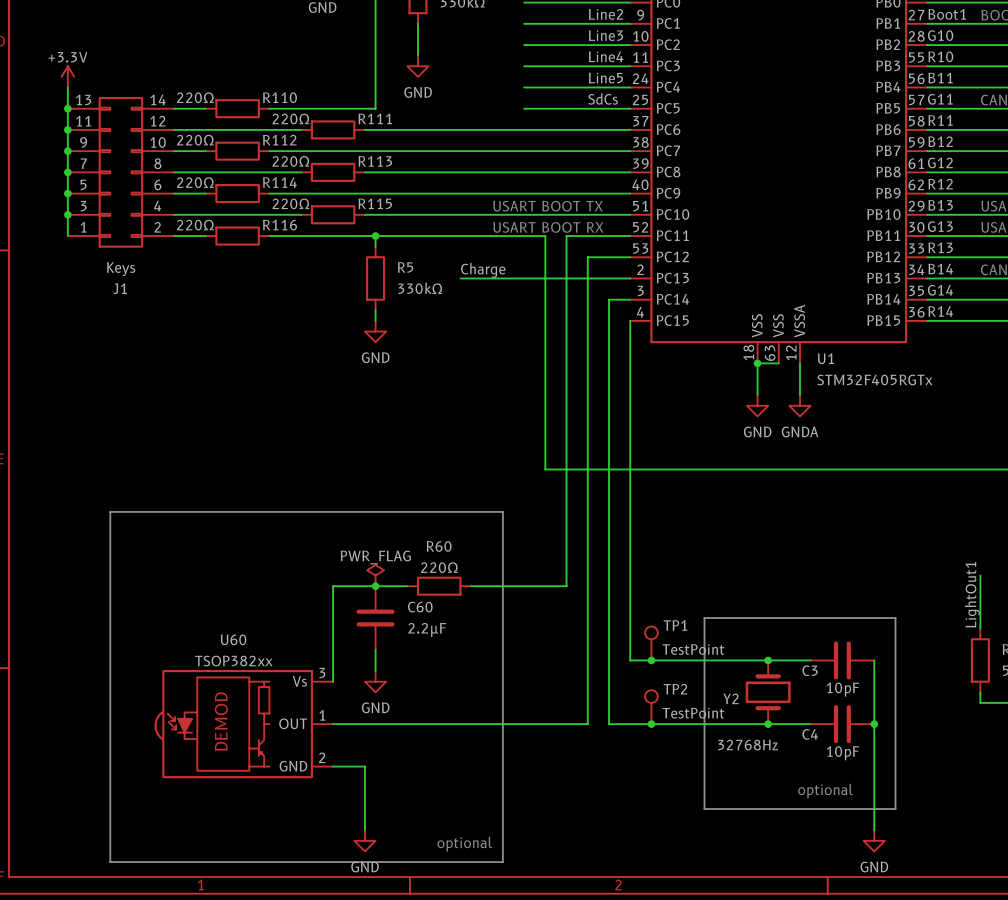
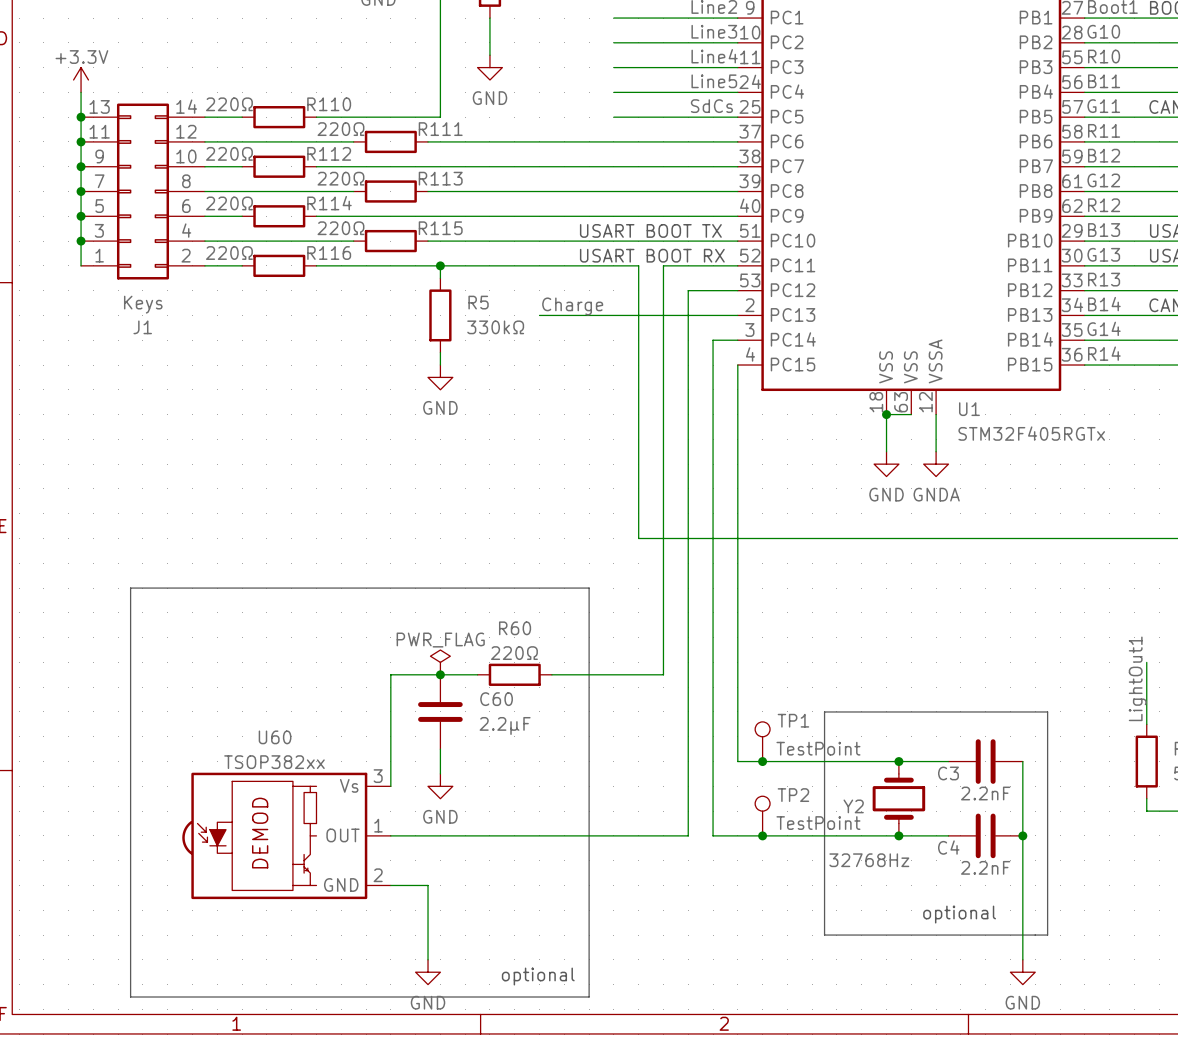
C3 value: 10pF (842, 689) -> 2.2nF (985, 793)
C4 value: 10pF (842, 753) -> 2.2nF (985, 867)

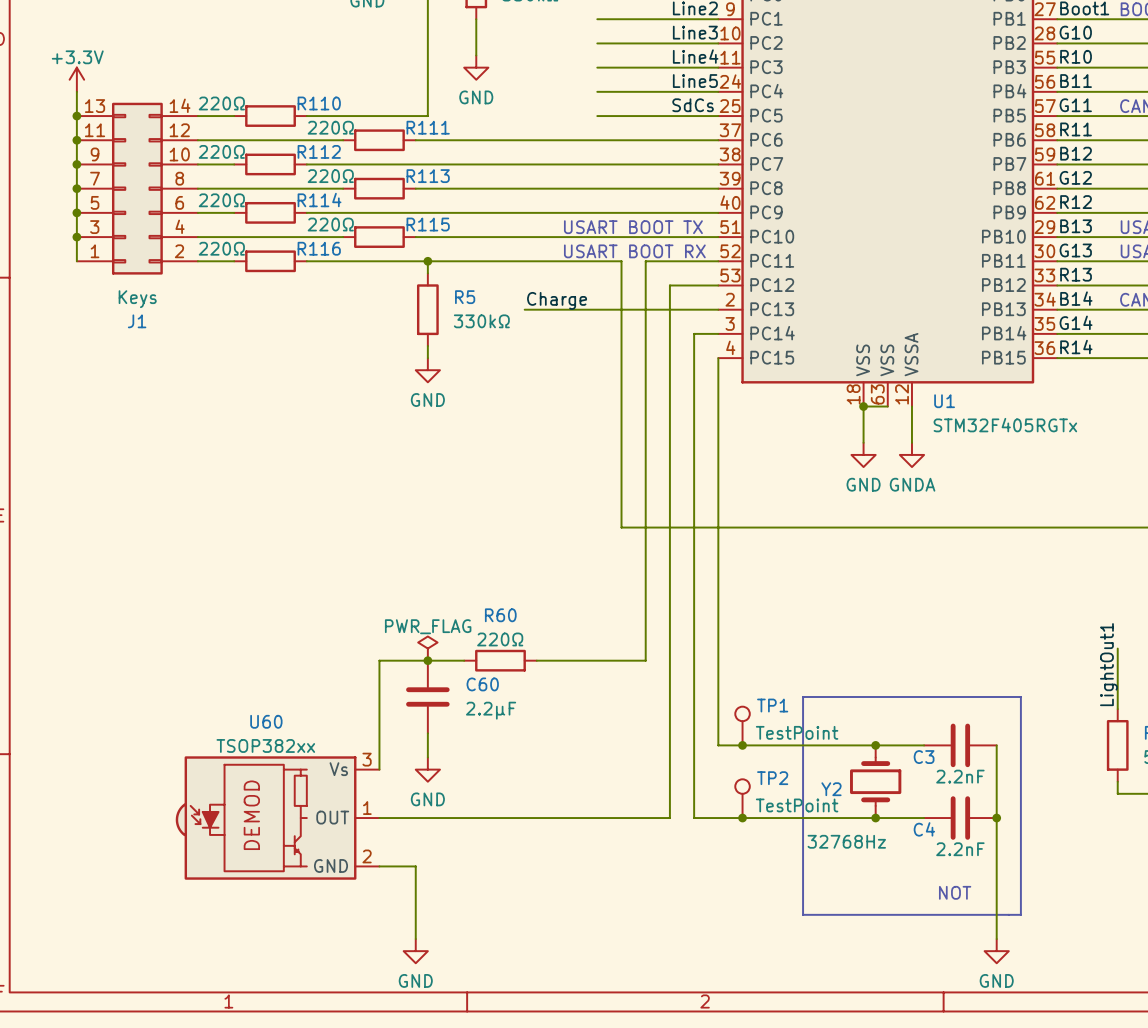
line: (130, 588) (589, 588) (589, 997) (130, 997) (130, 588) -> none
text: optional (959, 914) -> NOT (955, 892)
text: optional (538, 976) -> none

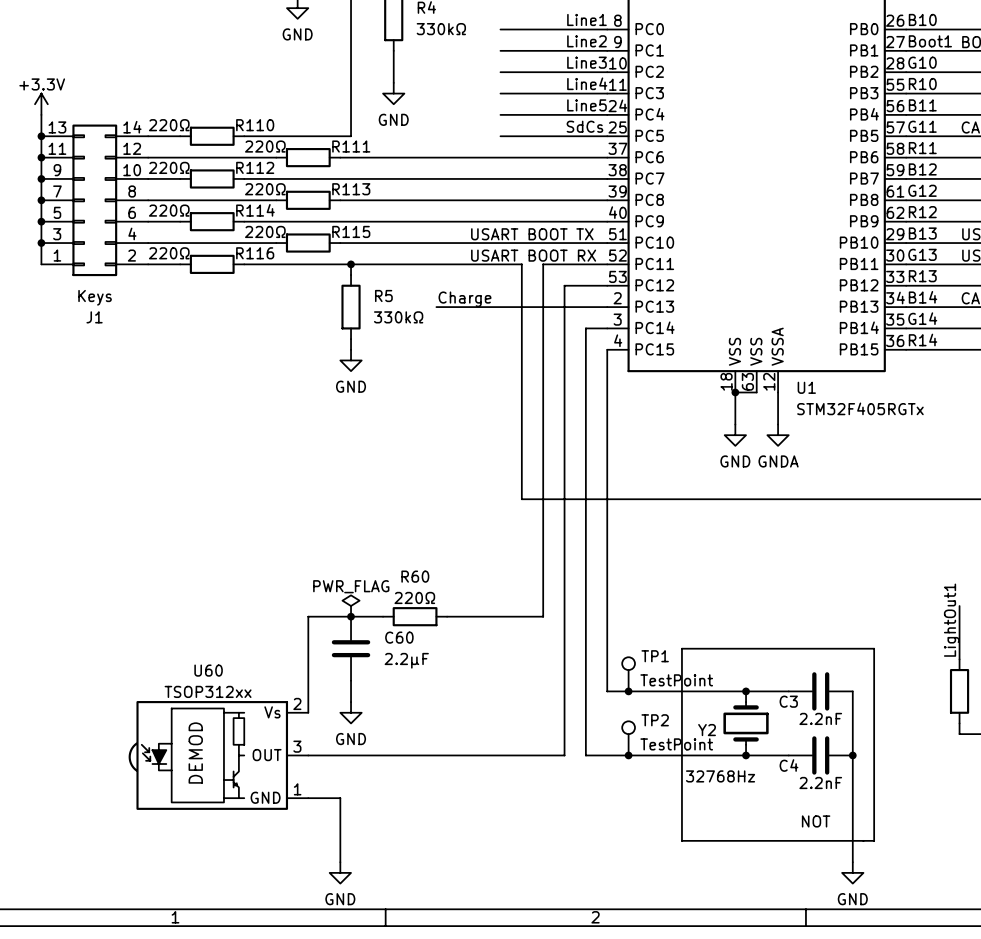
U60 value: TSOP382xx (265, 745) -> TSOP312xx (208, 691)
U60 pin number: 3 (367, 759) -> 2 (297, 703)
U60 pin number: 1 (367, 808) -> 3 (297, 746)
U60 pin number: 2 (367, 856) -> 1 (297, 789)

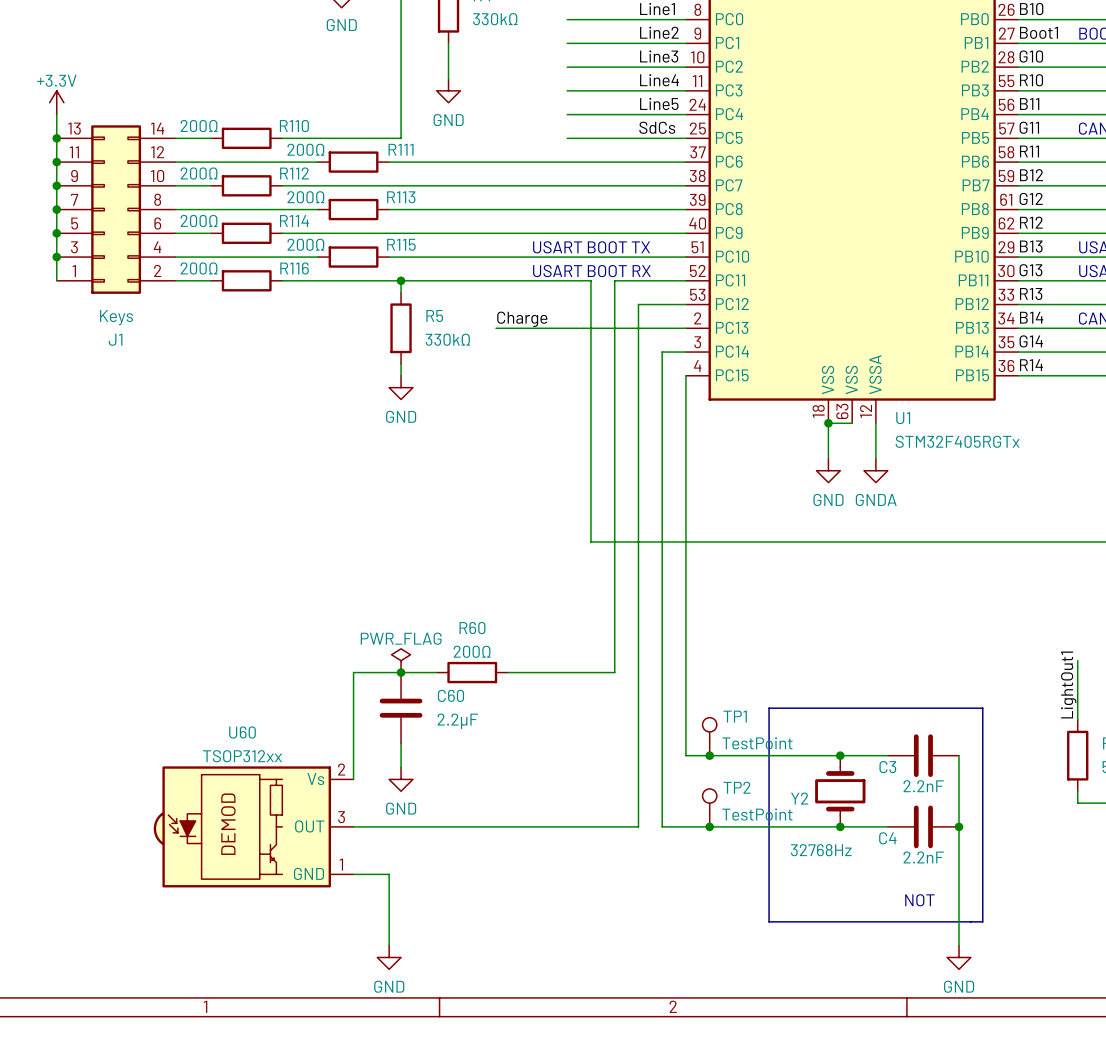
R110 value: 220Ω (169, 125) -> 200Ω (199, 126)
R111 value: 220Ω (265, 146) -> 200Ω (305, 149)
R112 value: 220Ω (169, 167) -> 200Ω (199, 173)
R113 value: 220Ω (265, 189) -> 200Ω (305, 197)
R114 value: 220Ω (169, 210) -> 200Ω (199, 221)
R115 value: 220Ω (265, 231) -> 200Ω (305, 244)
R116 value: 220Ω (169, 253) -> 200Ω (199, 268)
R60 value: 220Ω (414, 597) -> 200Ω (472, 651)

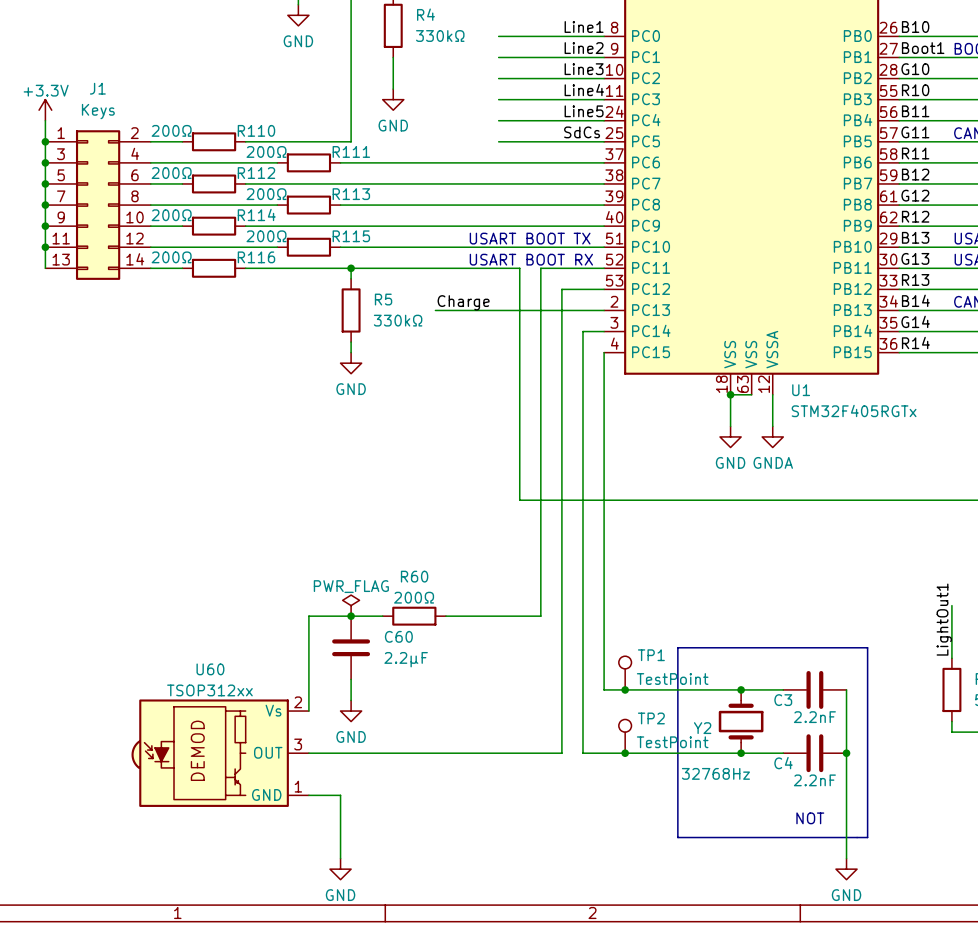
J1 flip: as is (116, 209) -> up-down (98, 205)

